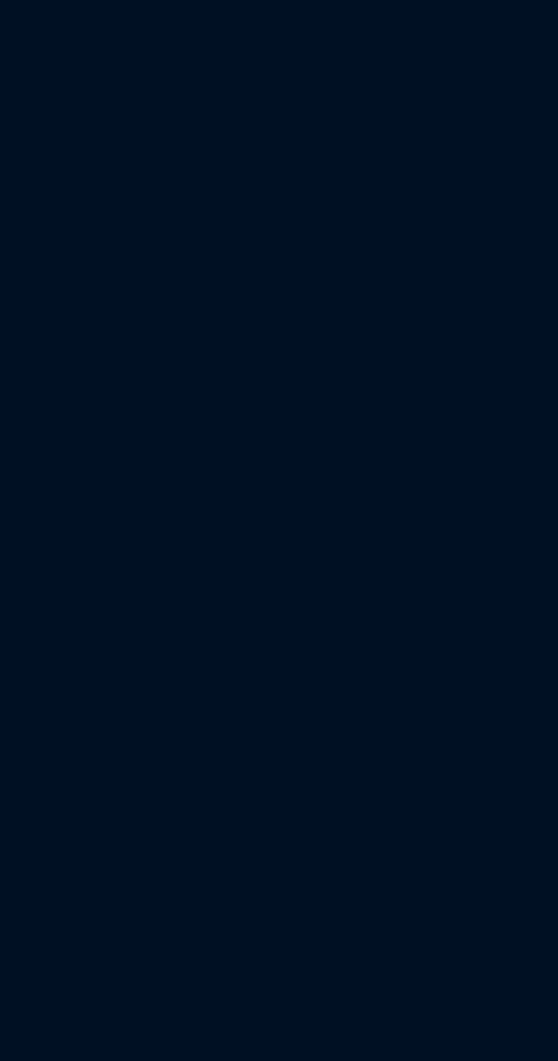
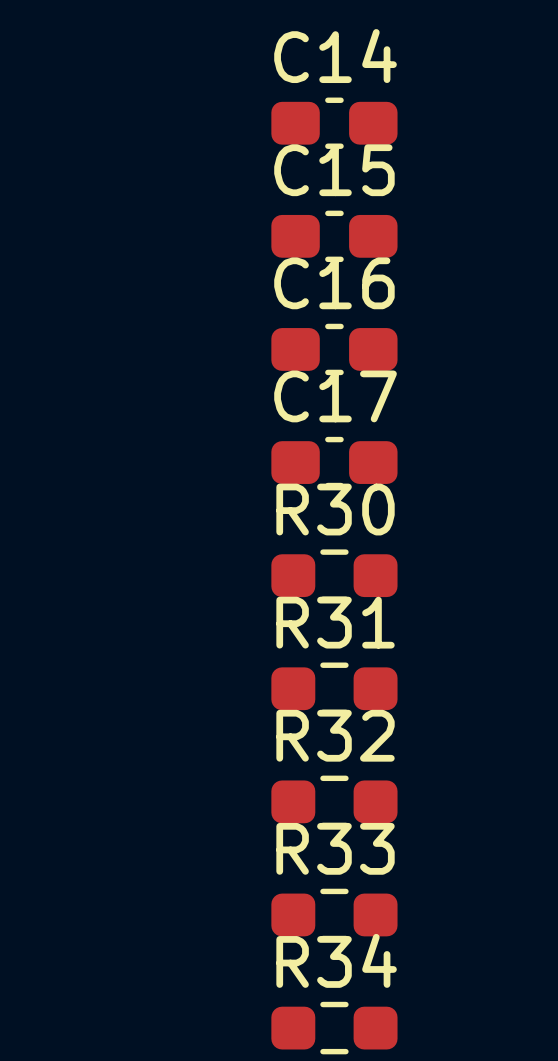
C14: none -> (334, 123)
C15: none -> (334, 236)
C16: none -> (334, 349)
C17: none -> (334, 462)
R30: none -> (334, 575)
R31: none -> (334, 688)
R32: none -> (334, 801)
R33: none -> (334, 914)
R34: none -> (334, 1028)

